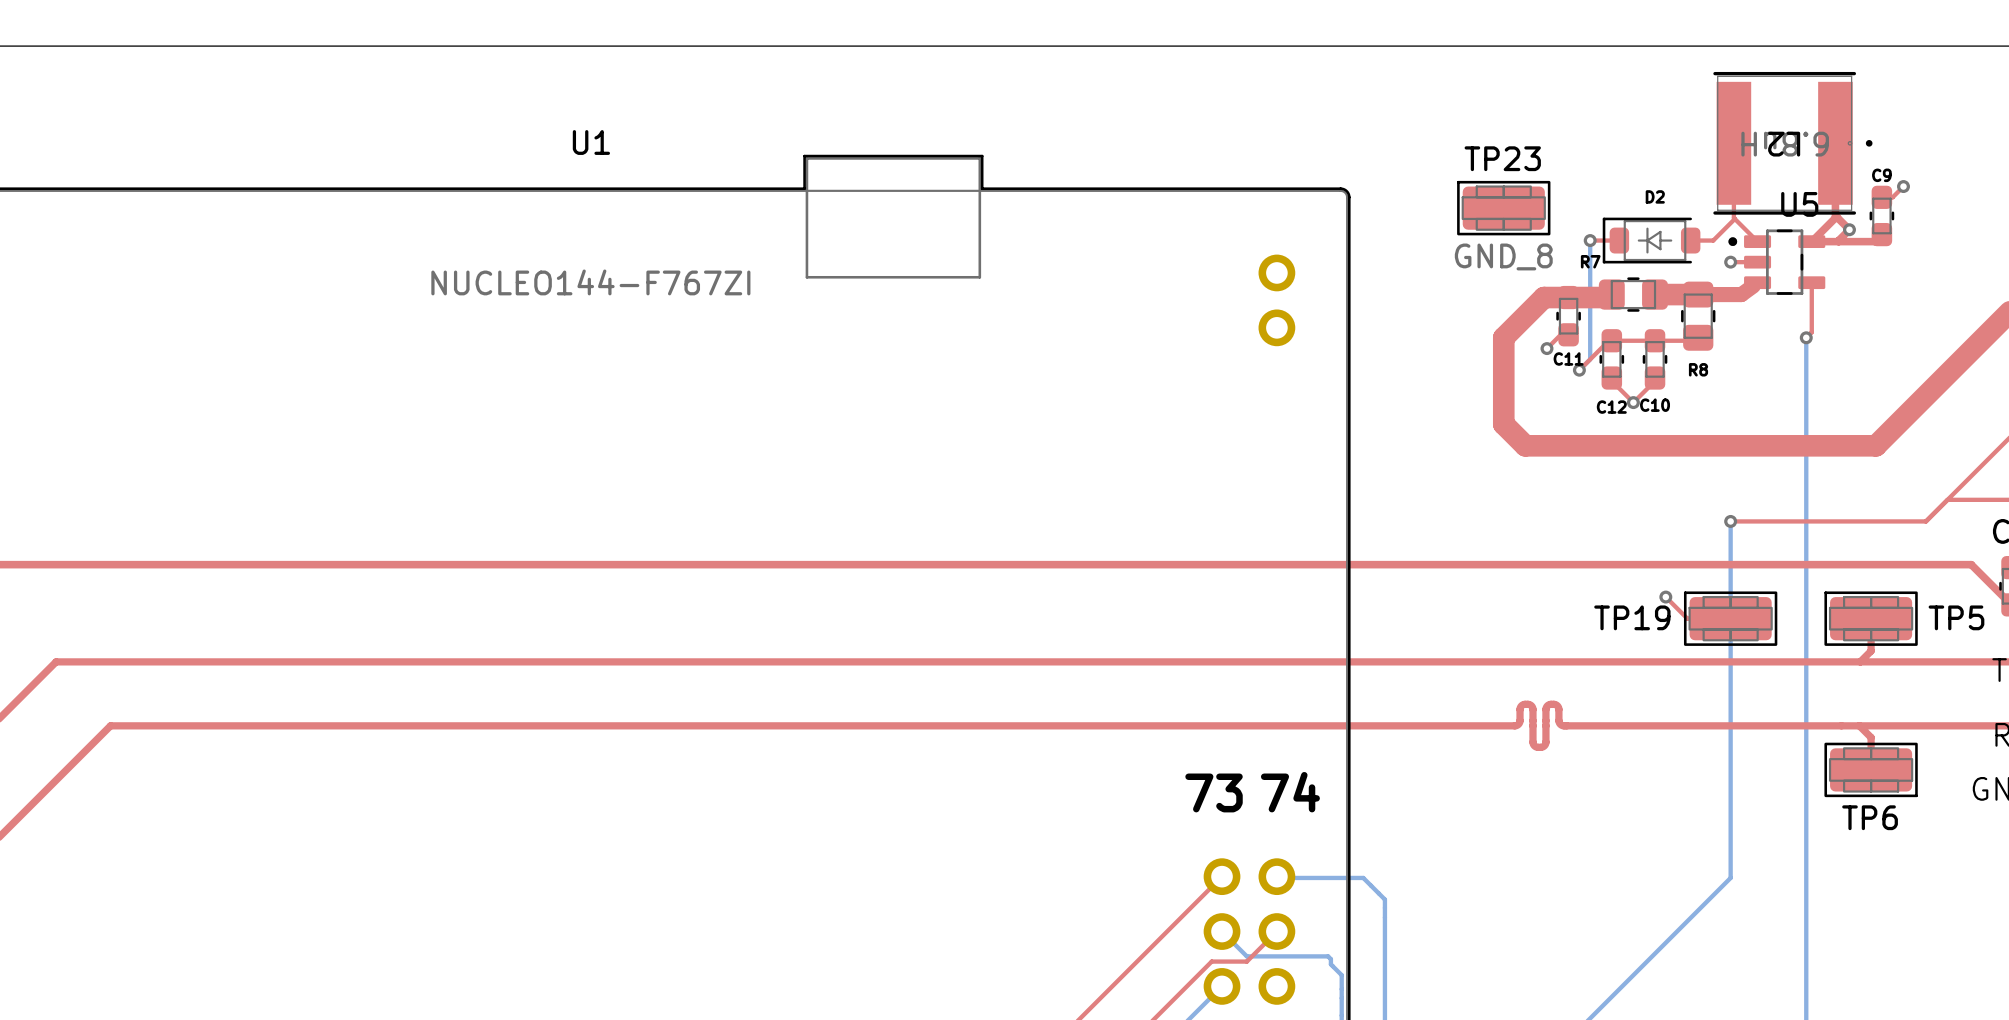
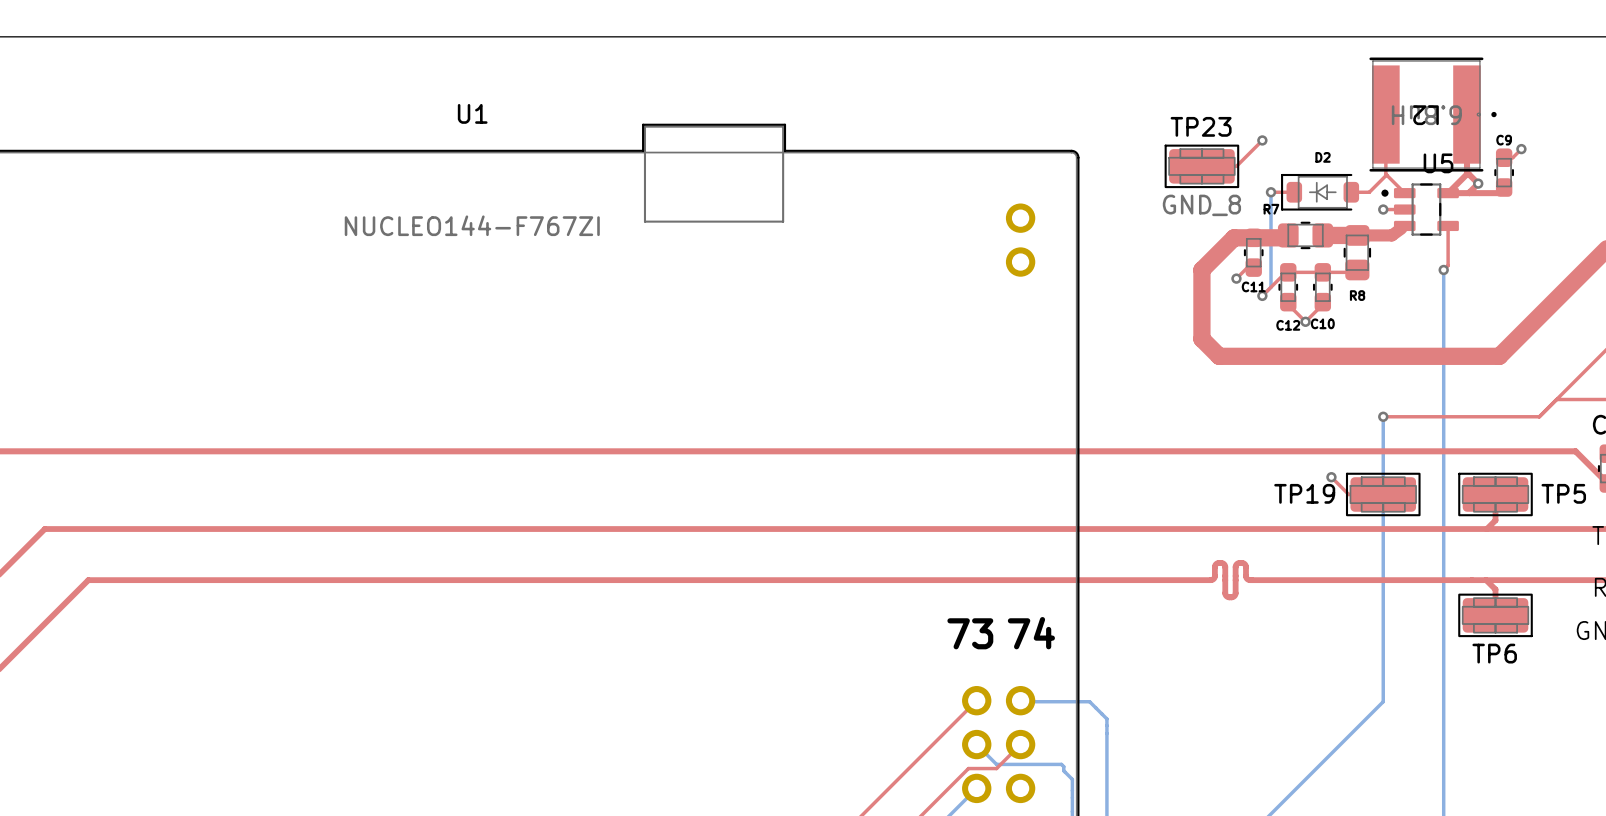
top track: none -> (1262, 140) (1236, 166) (1201, 166)
via: none -> (1262, 140)

